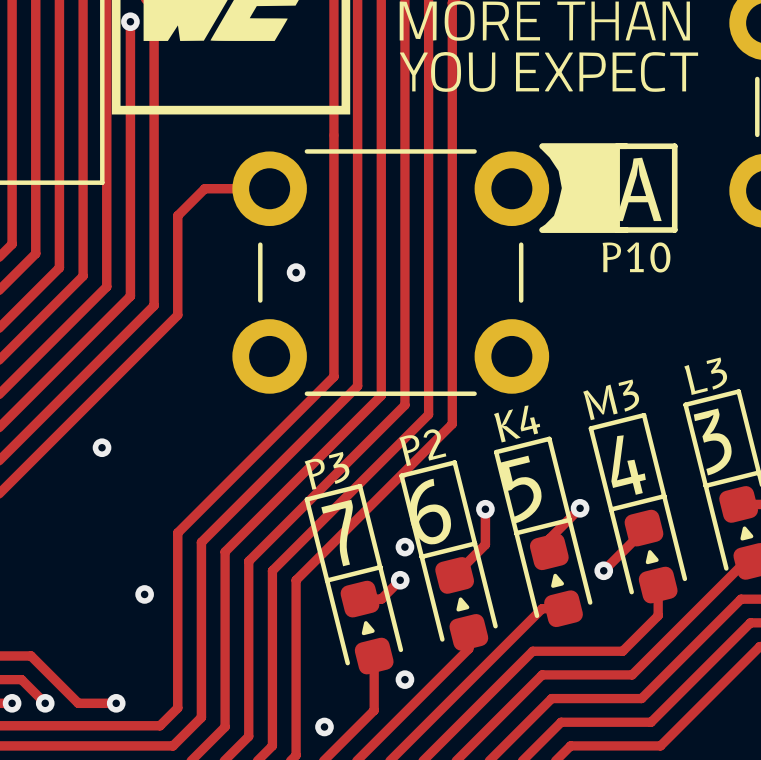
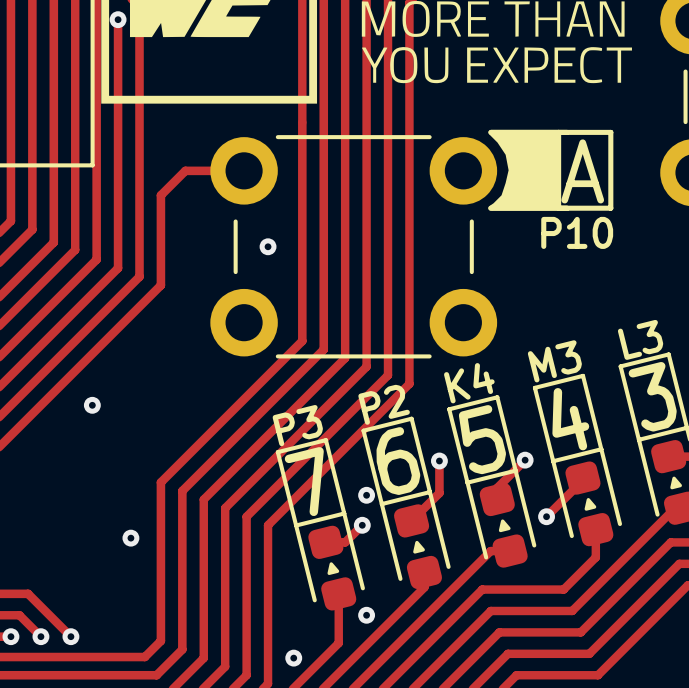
track: (78, 703) (116, 703) -> none
via position: (116, 703) -> (70, 636)

